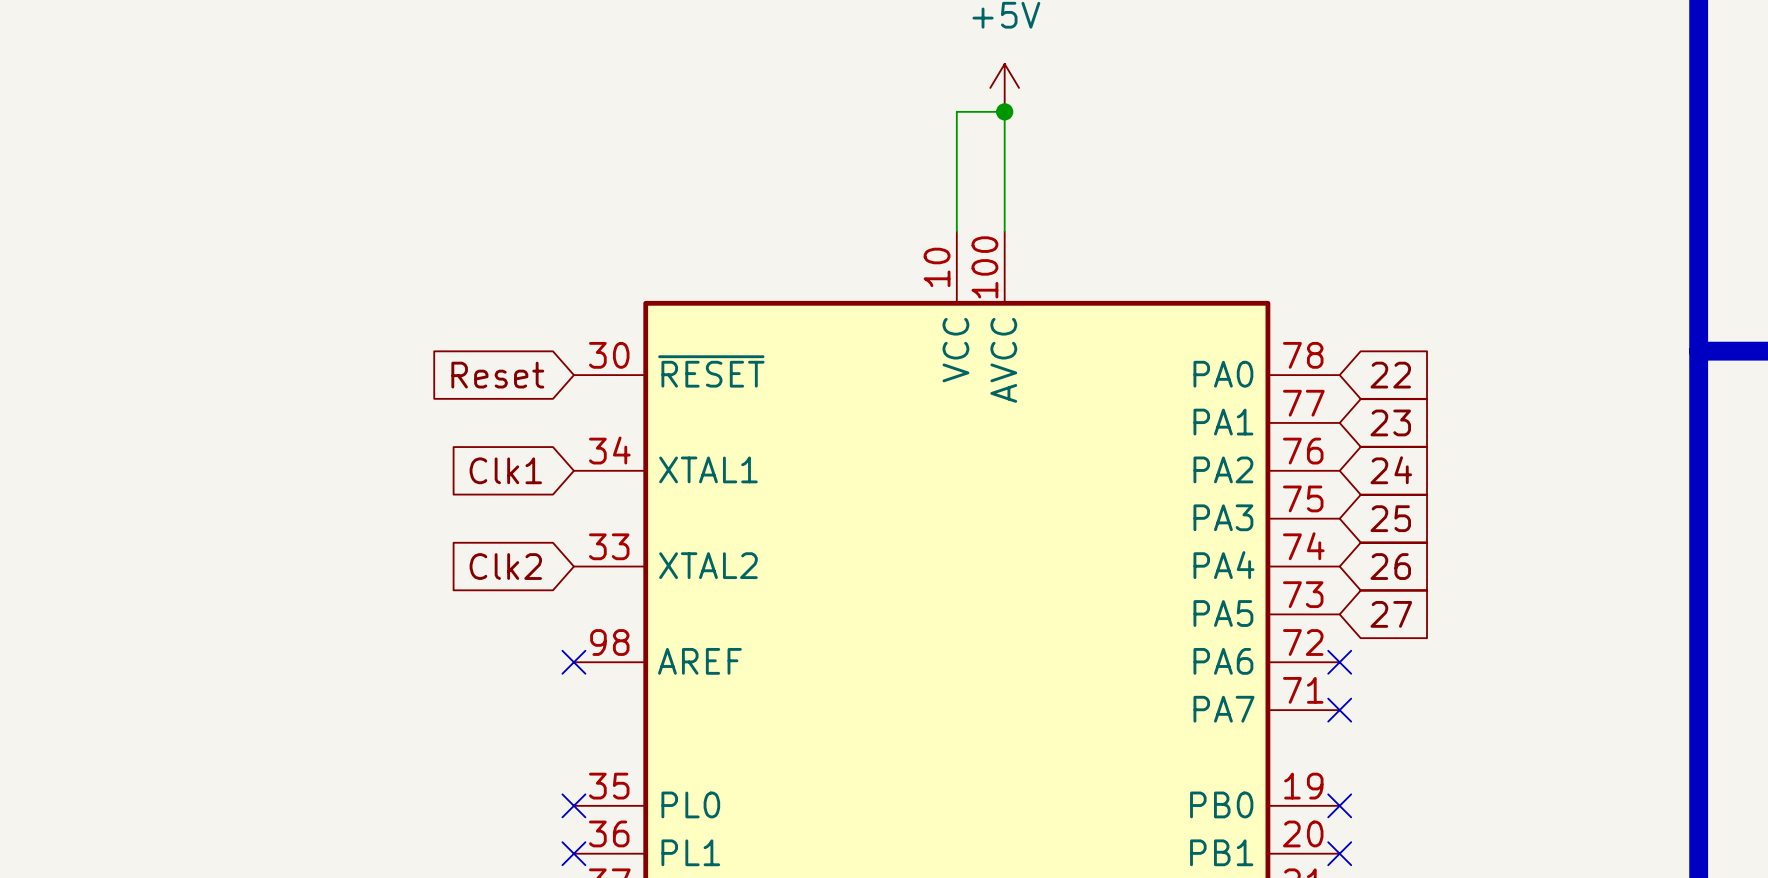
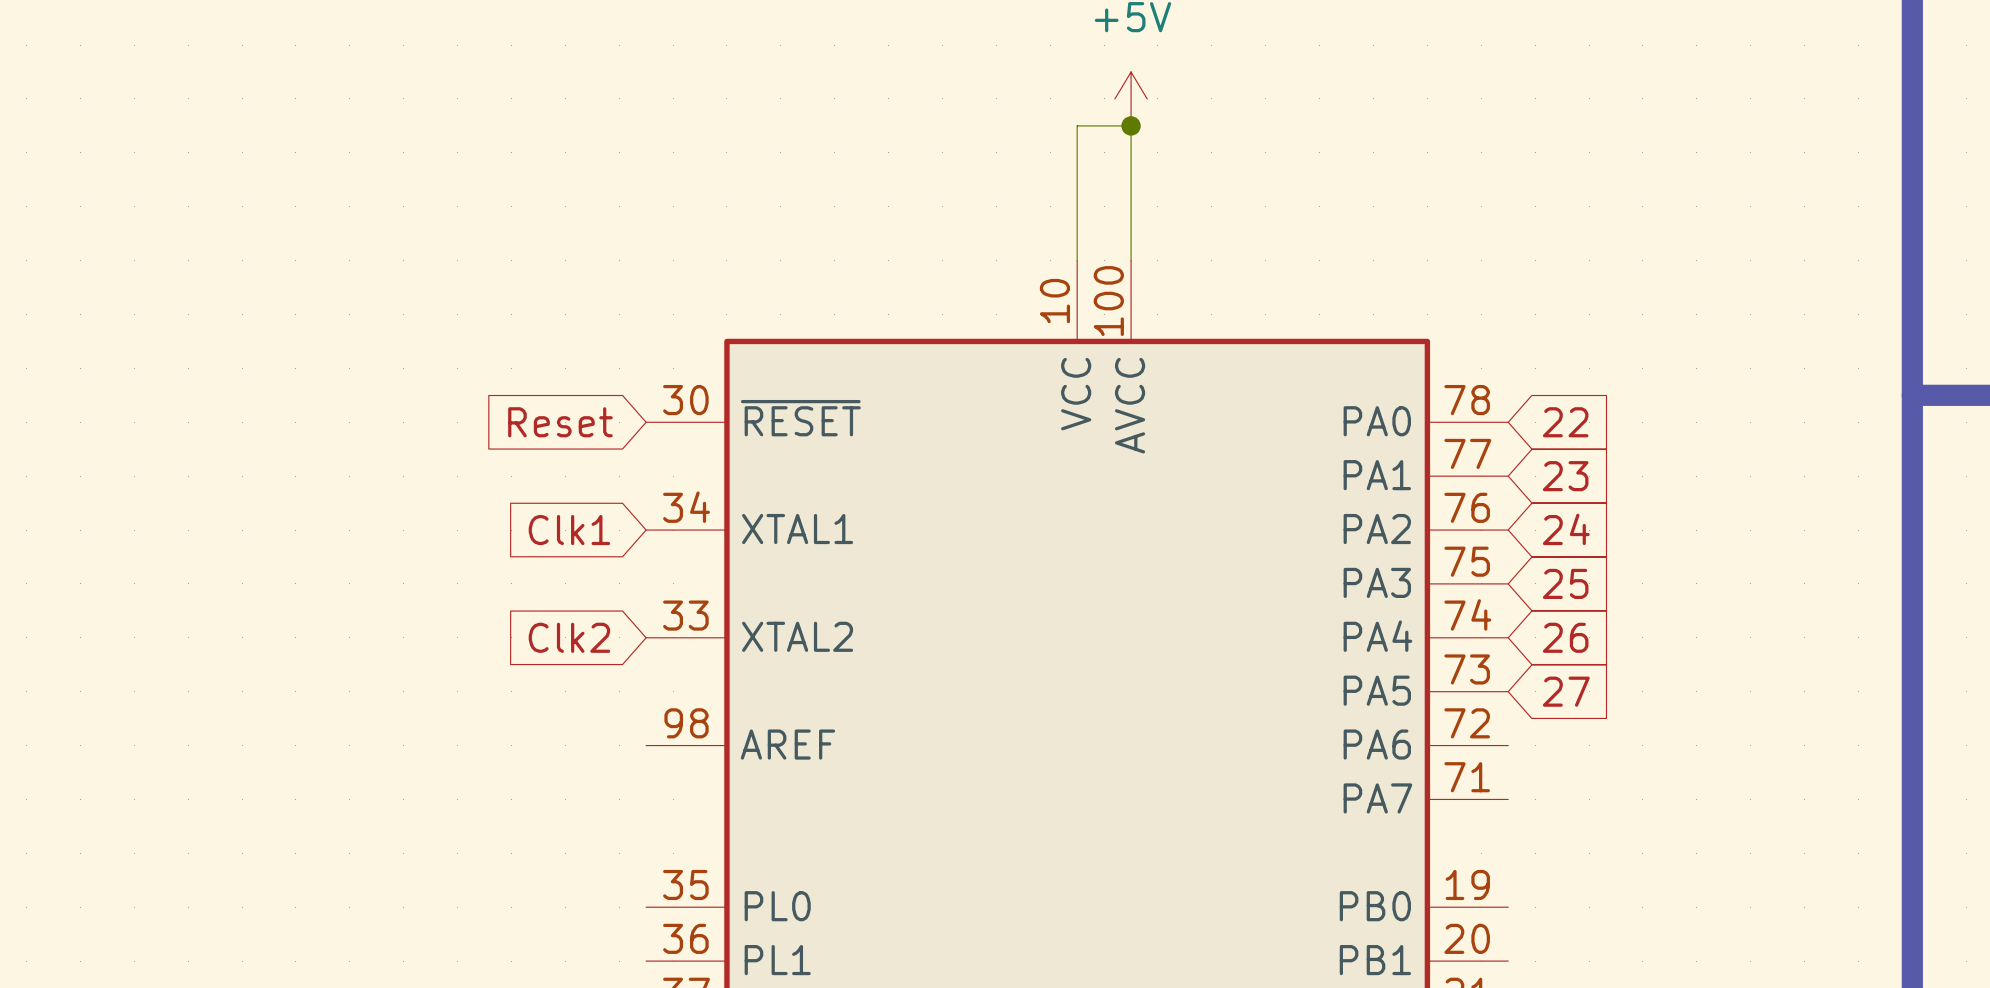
no-connect mark: (573, 662) -> none
no-connect mark: (1339, 662) -> none
no-connect mark: (1339, 710) -> none
no-connect mark: (573, 805) -> none
no-connect mark: (1339, 805) -> none
no-connect mark: (573, 853) -> none
no-connect mark: (1339, 853) -> none

